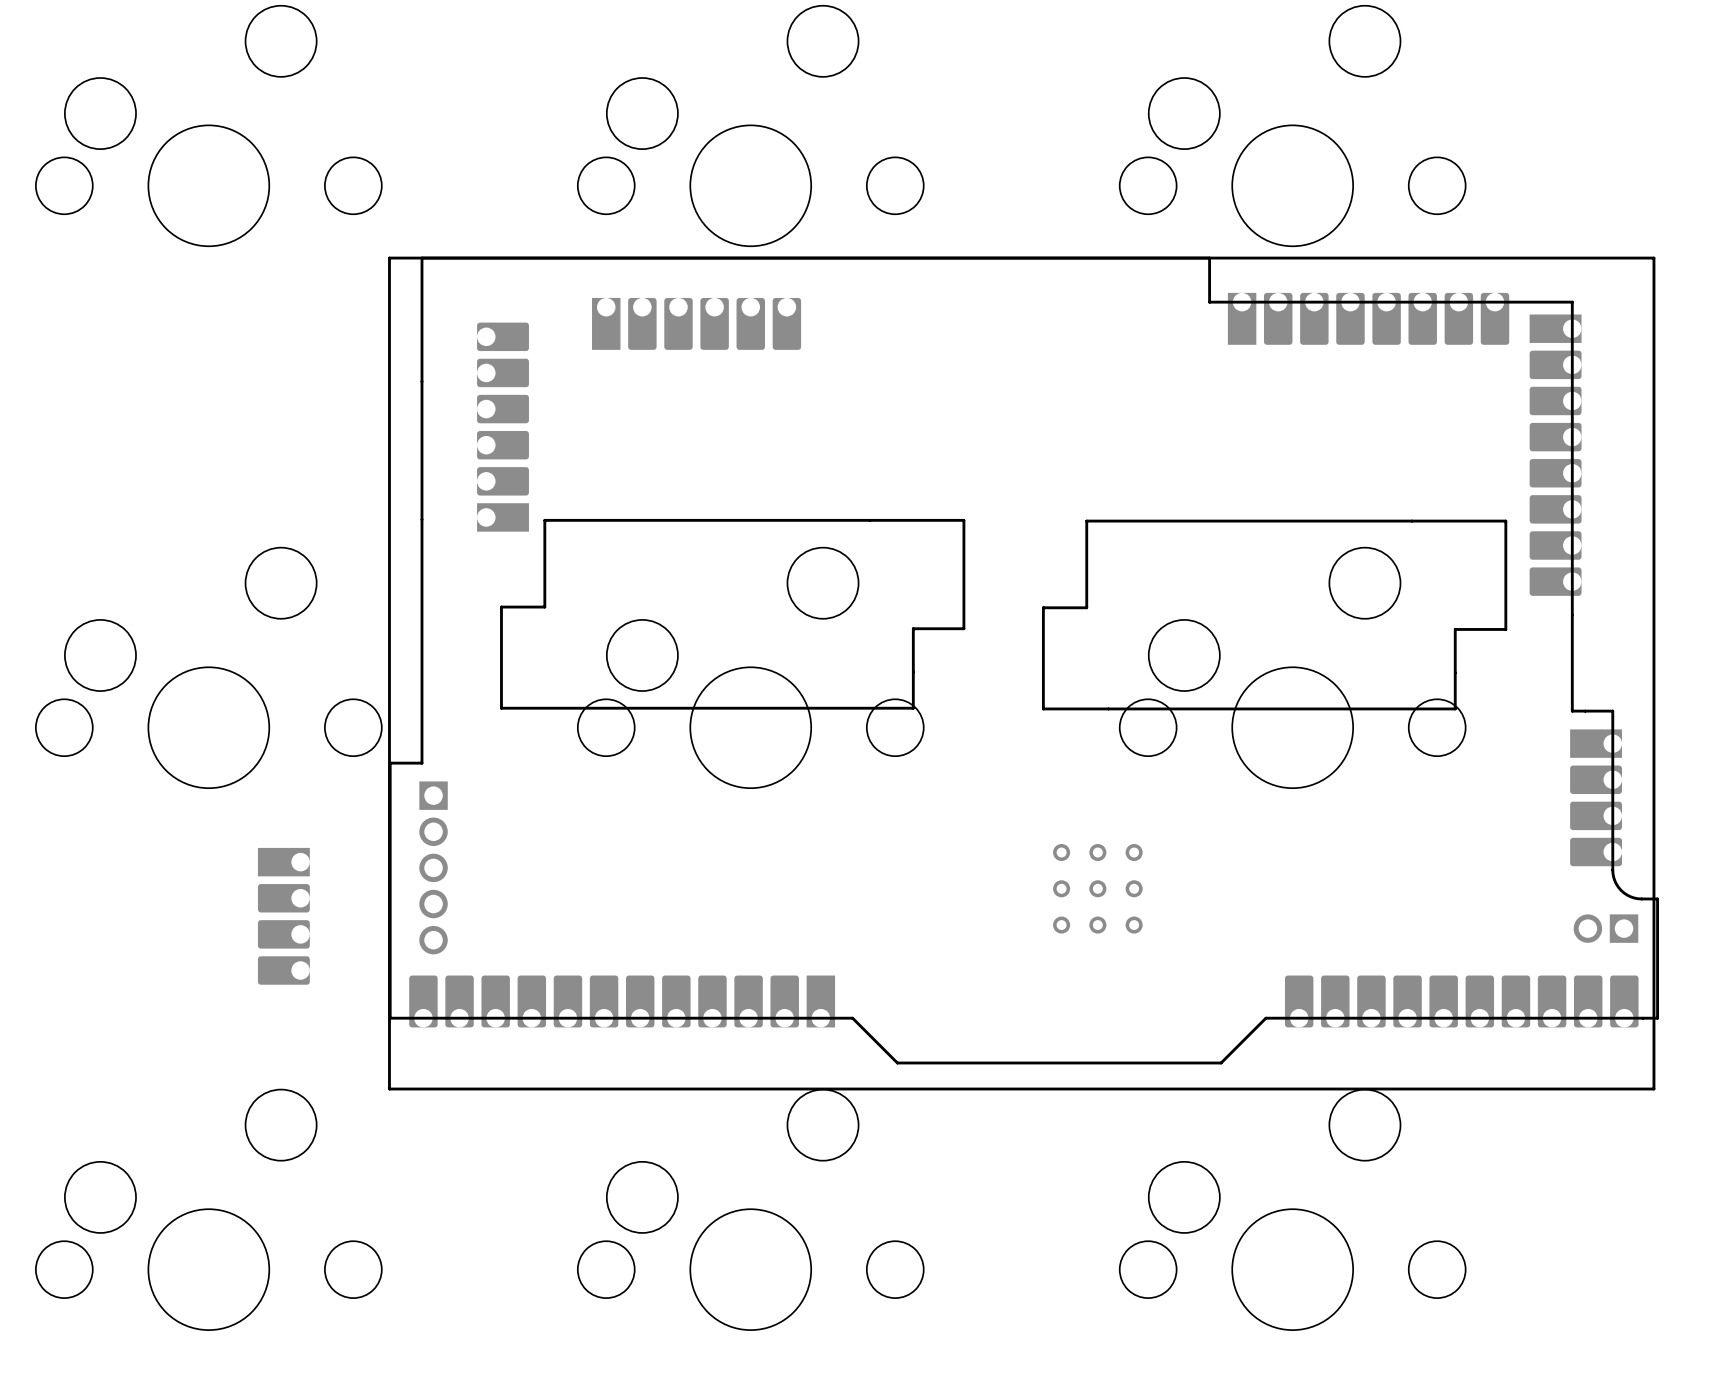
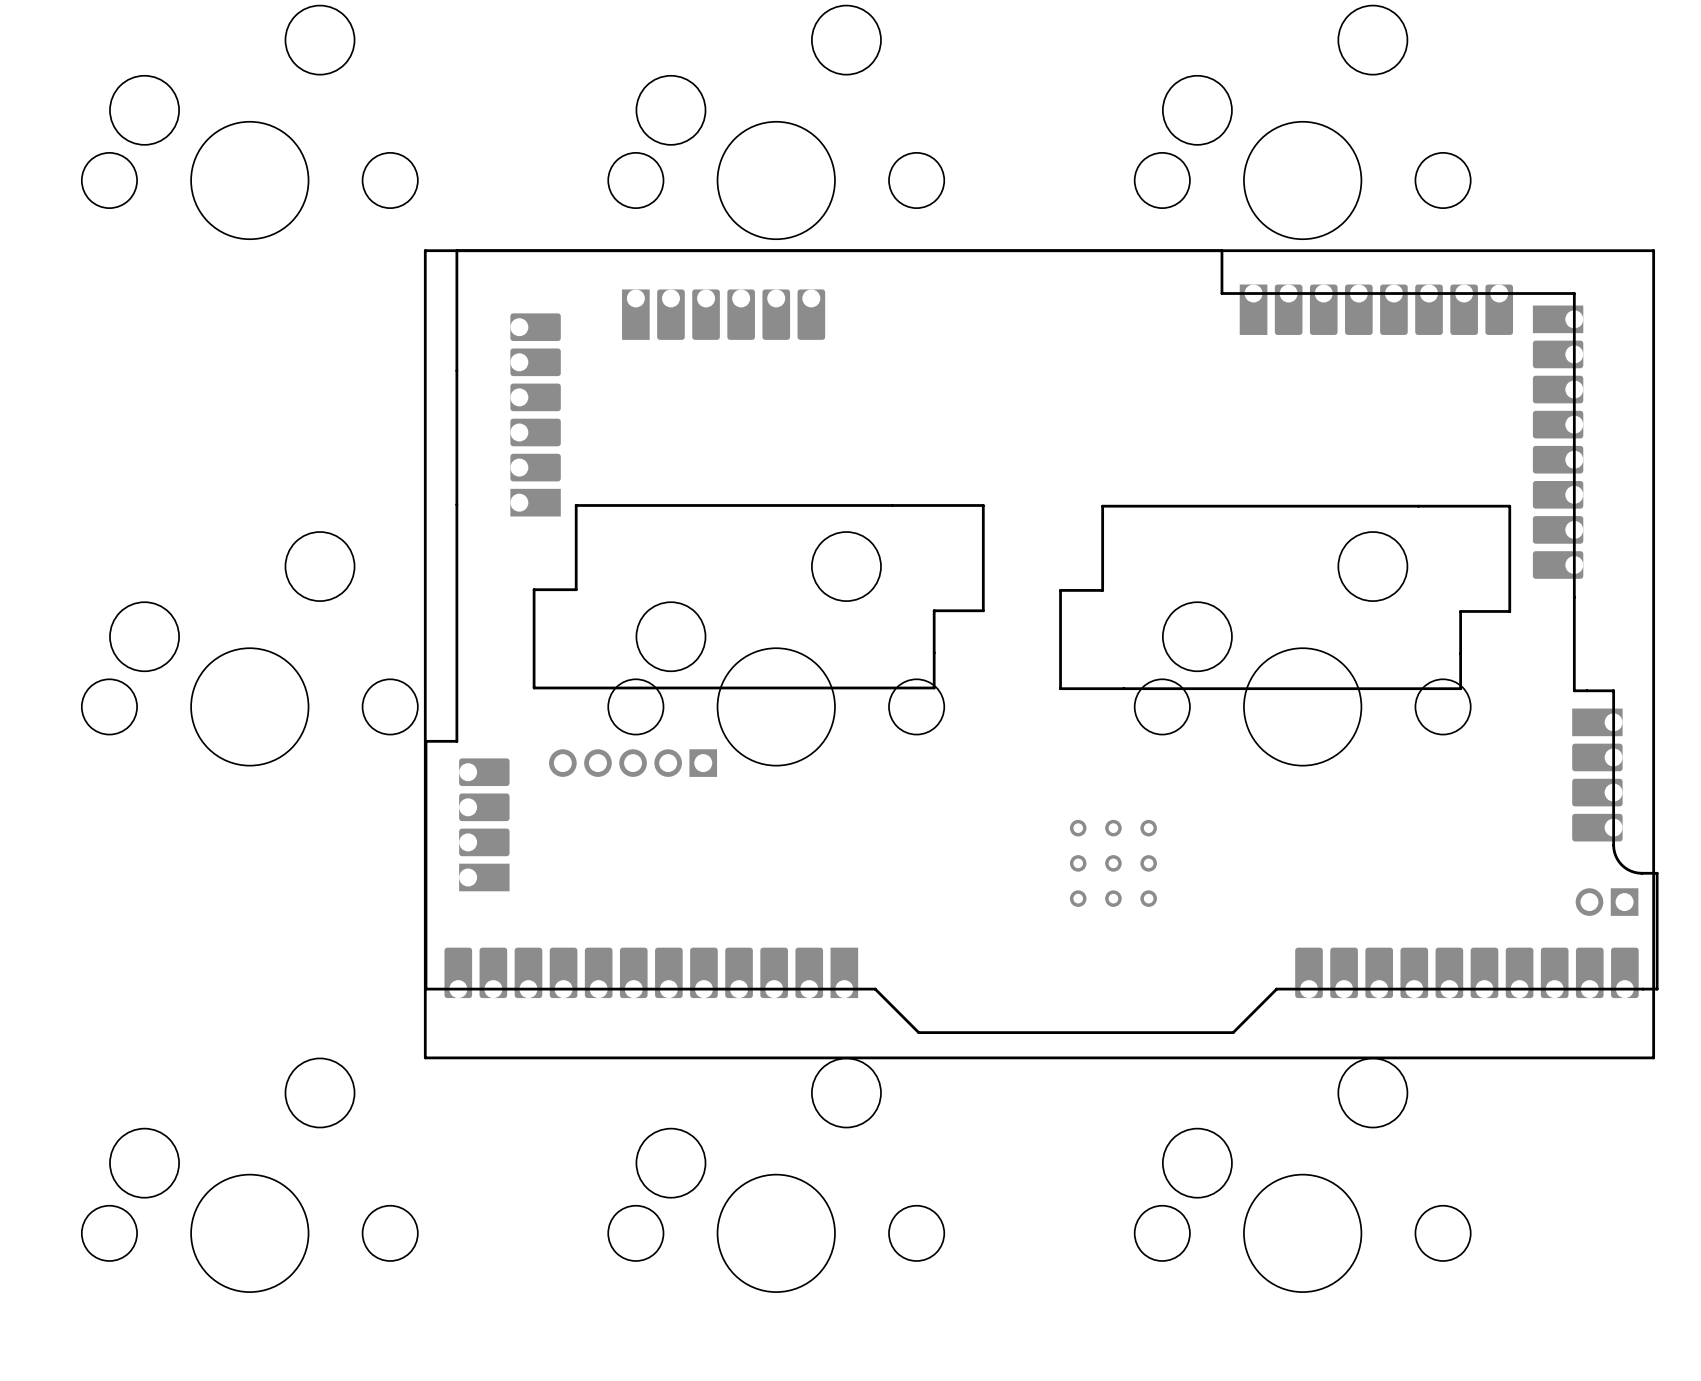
part footprint: [419, 781, 448, 955] -> [459, 758, 510, 892]
part: none -> (633, 763)
part: (283, 916) -> none

